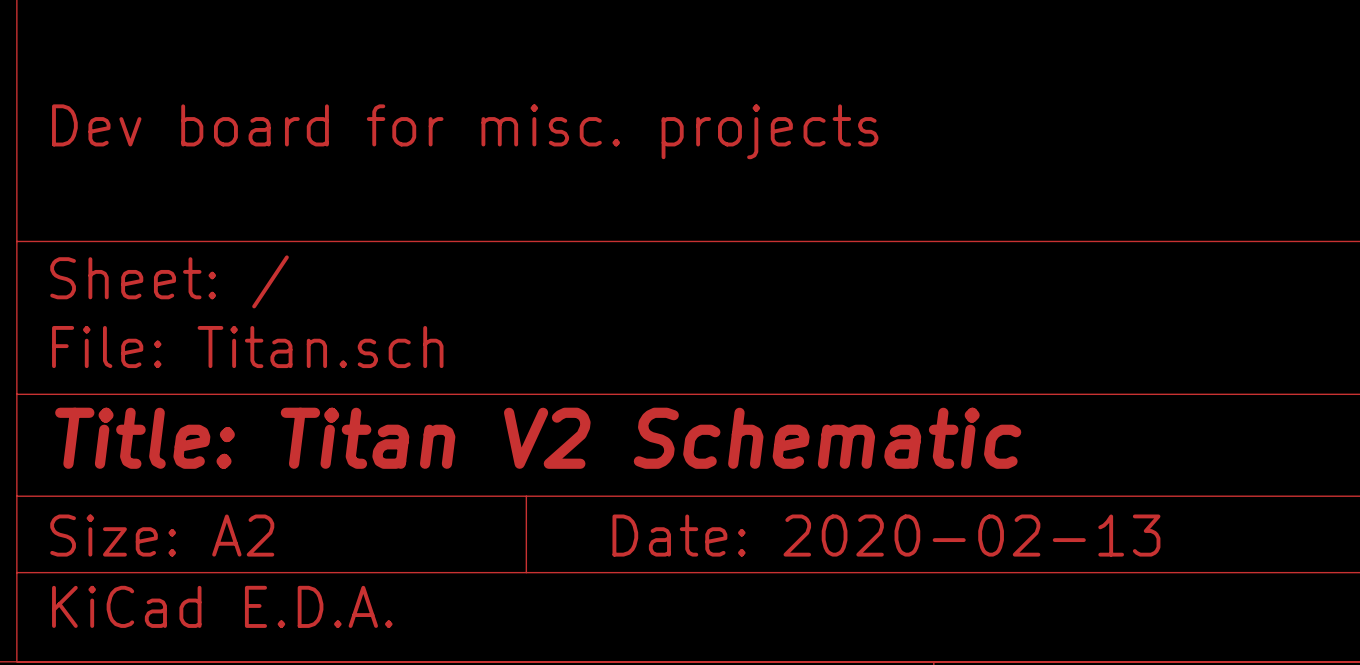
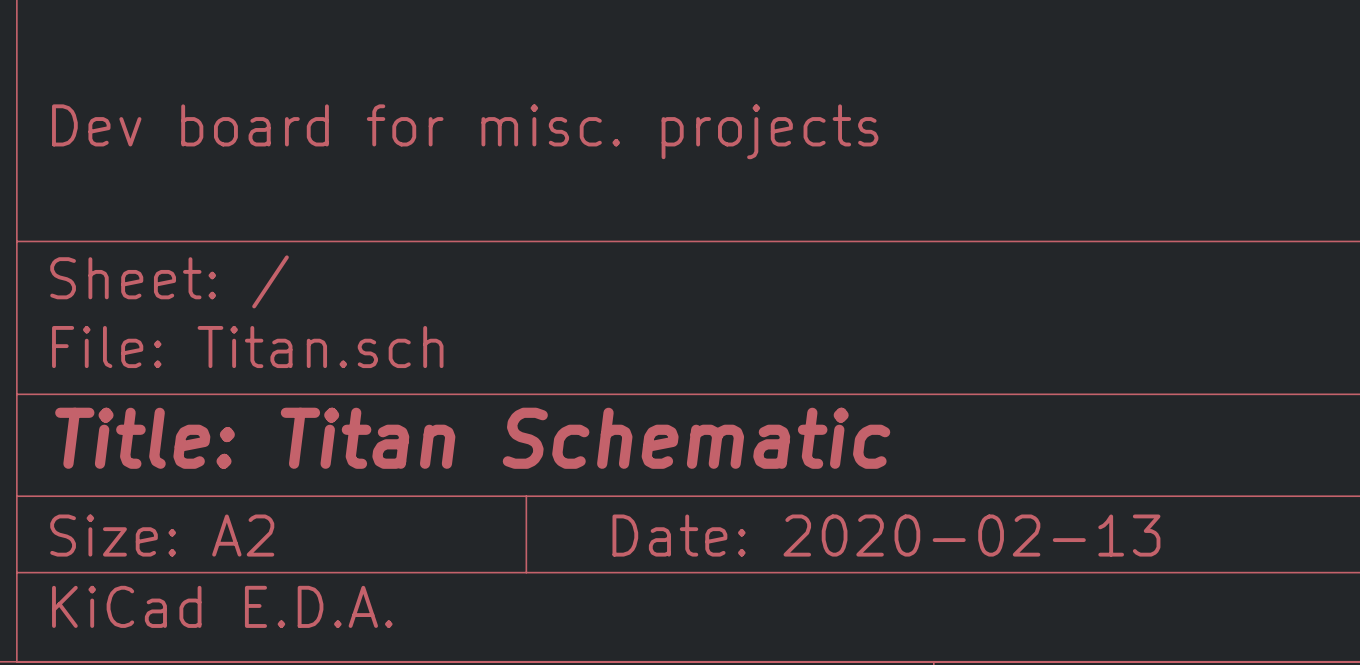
title block: Title: Titan V2 Schematic (538, 438) -> Title: Titan Schematic (472, 438)

